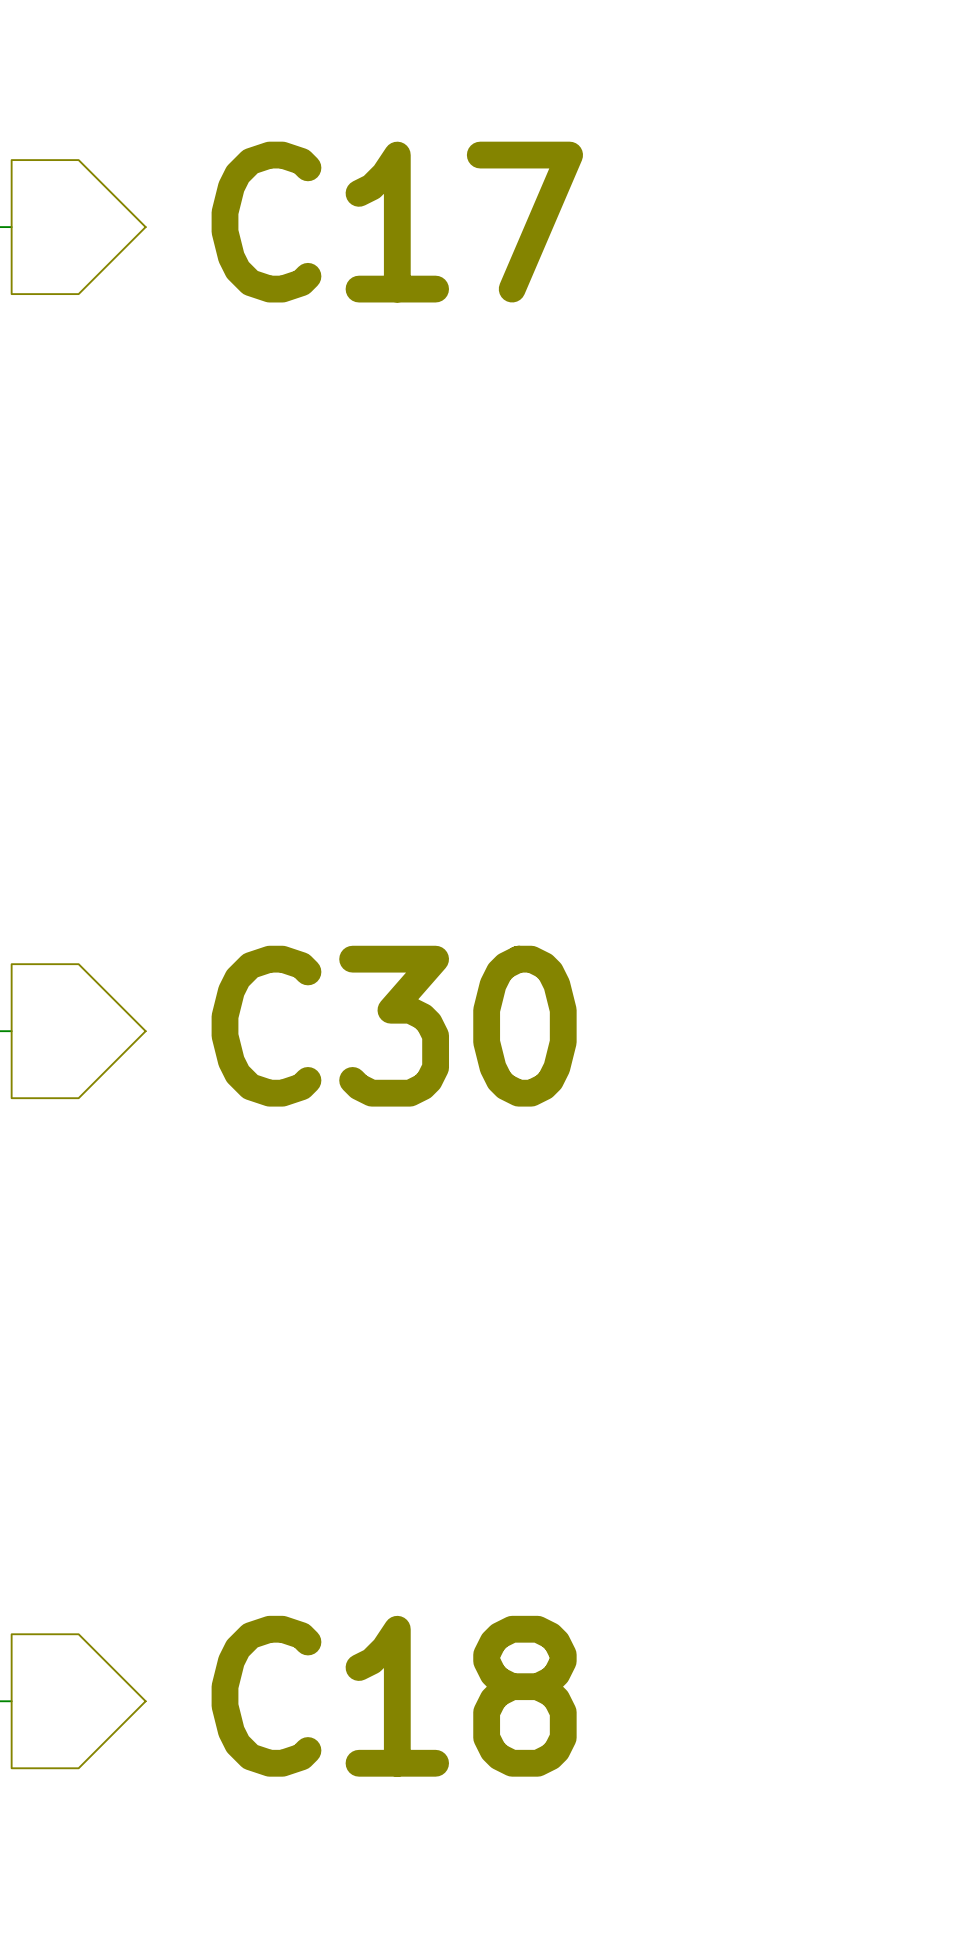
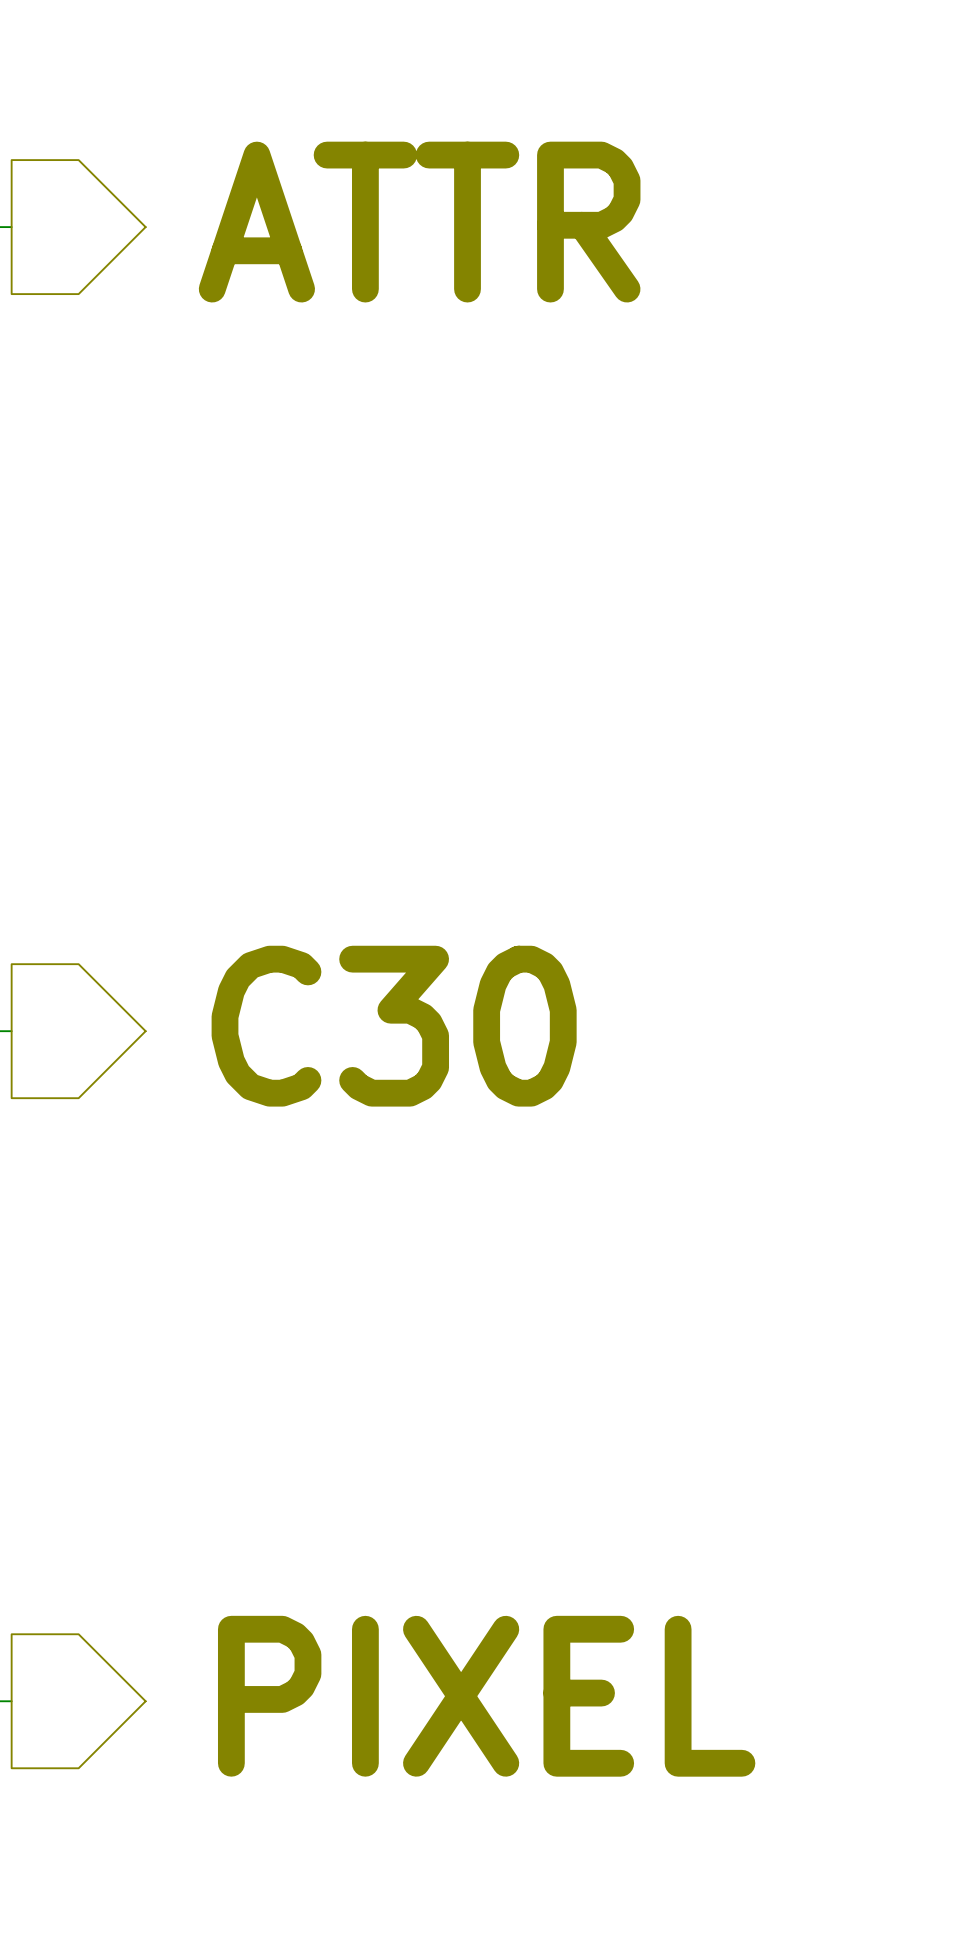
hierarchical label: C17 (397, 222) -> ATTR (419, 222)
hierarchical label: C18 (394, 1696) -> PIXEL (486, 1696)

